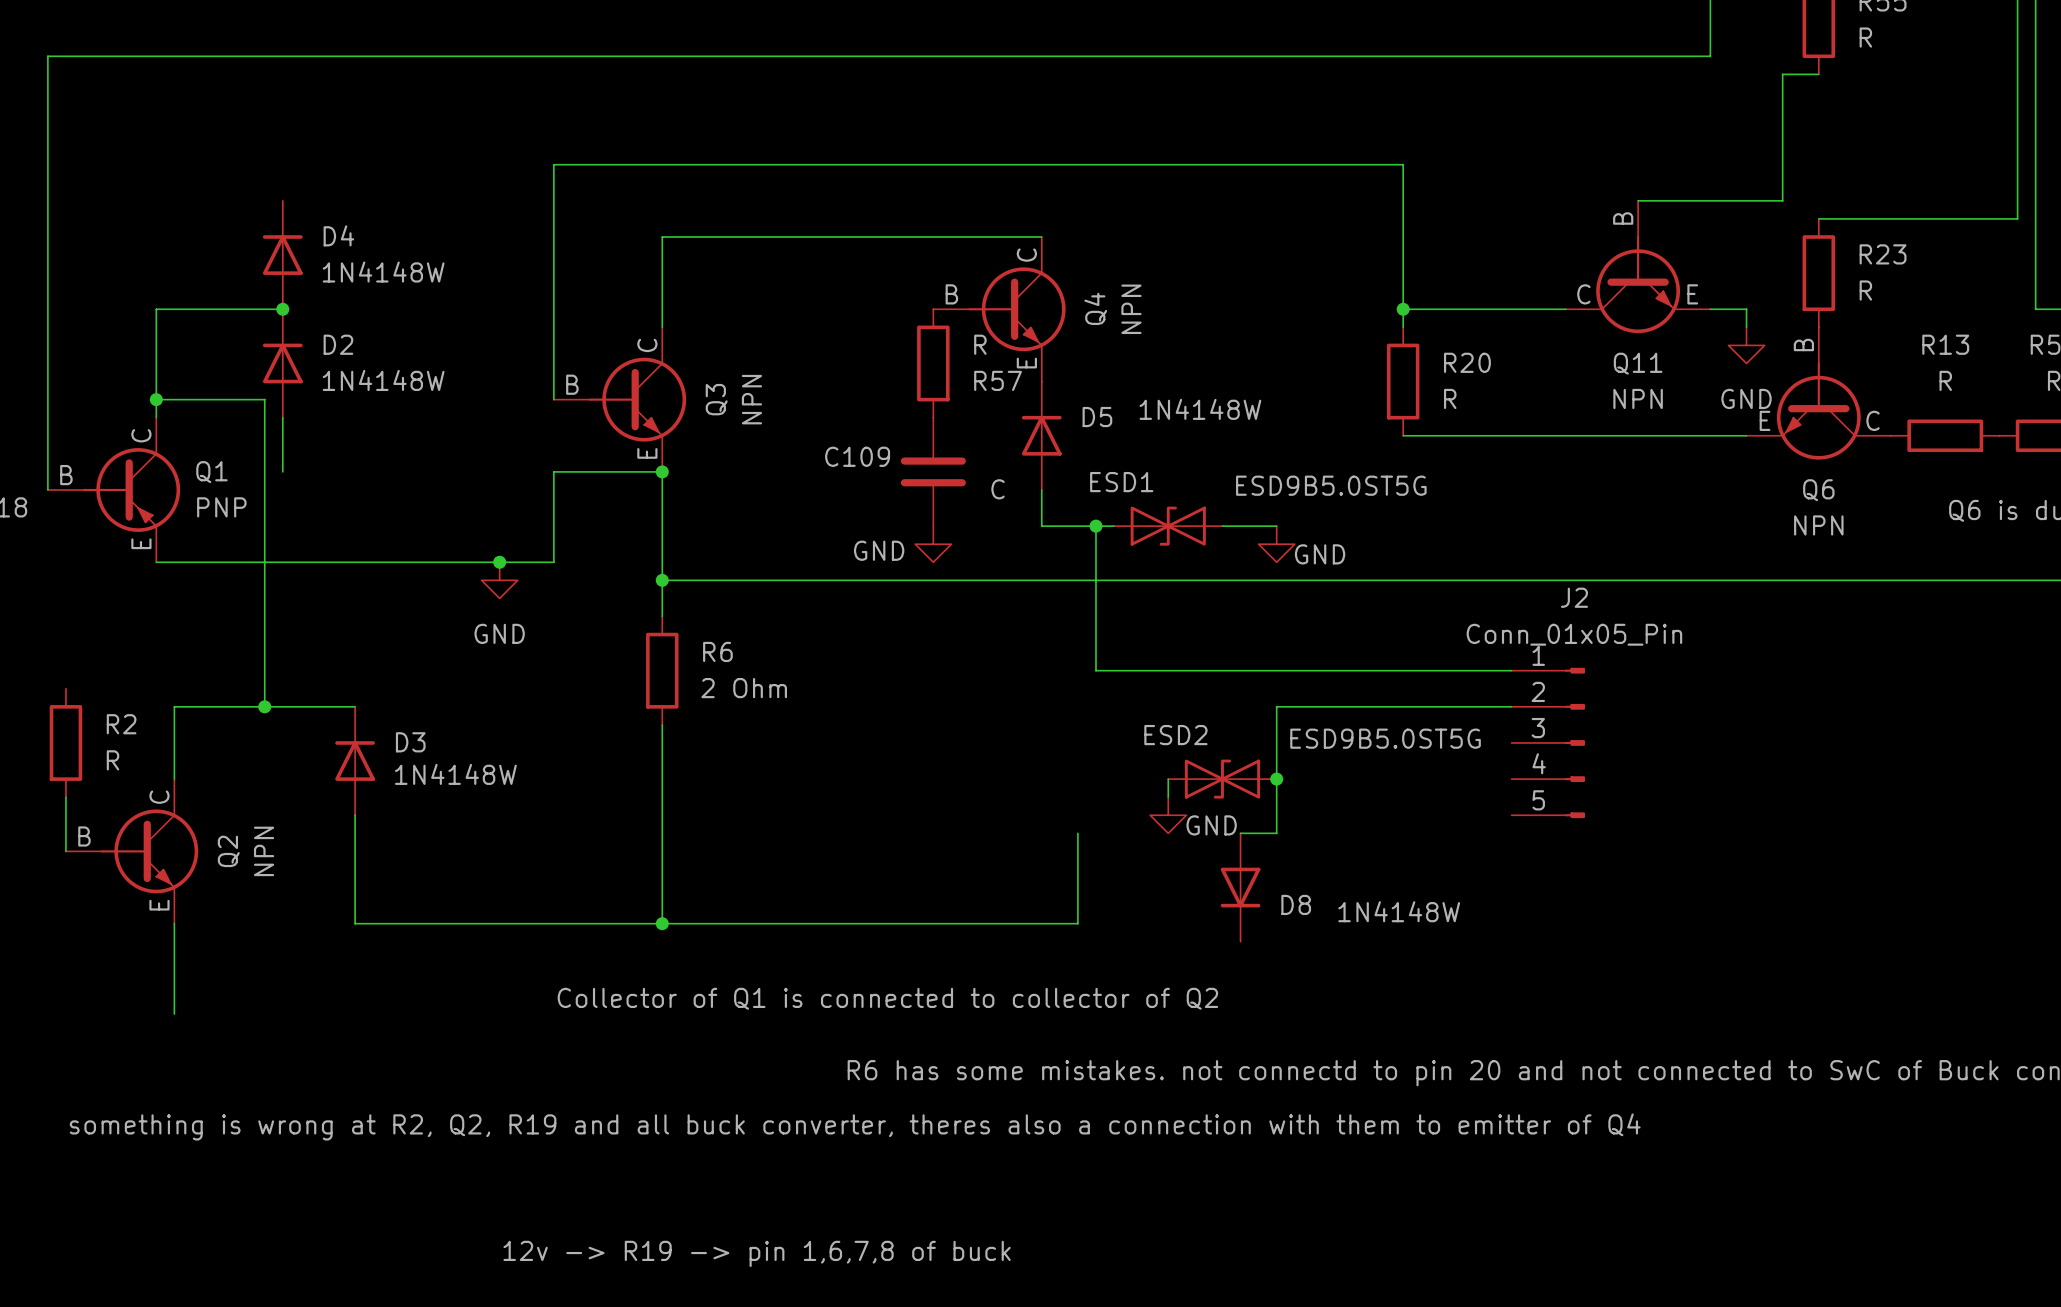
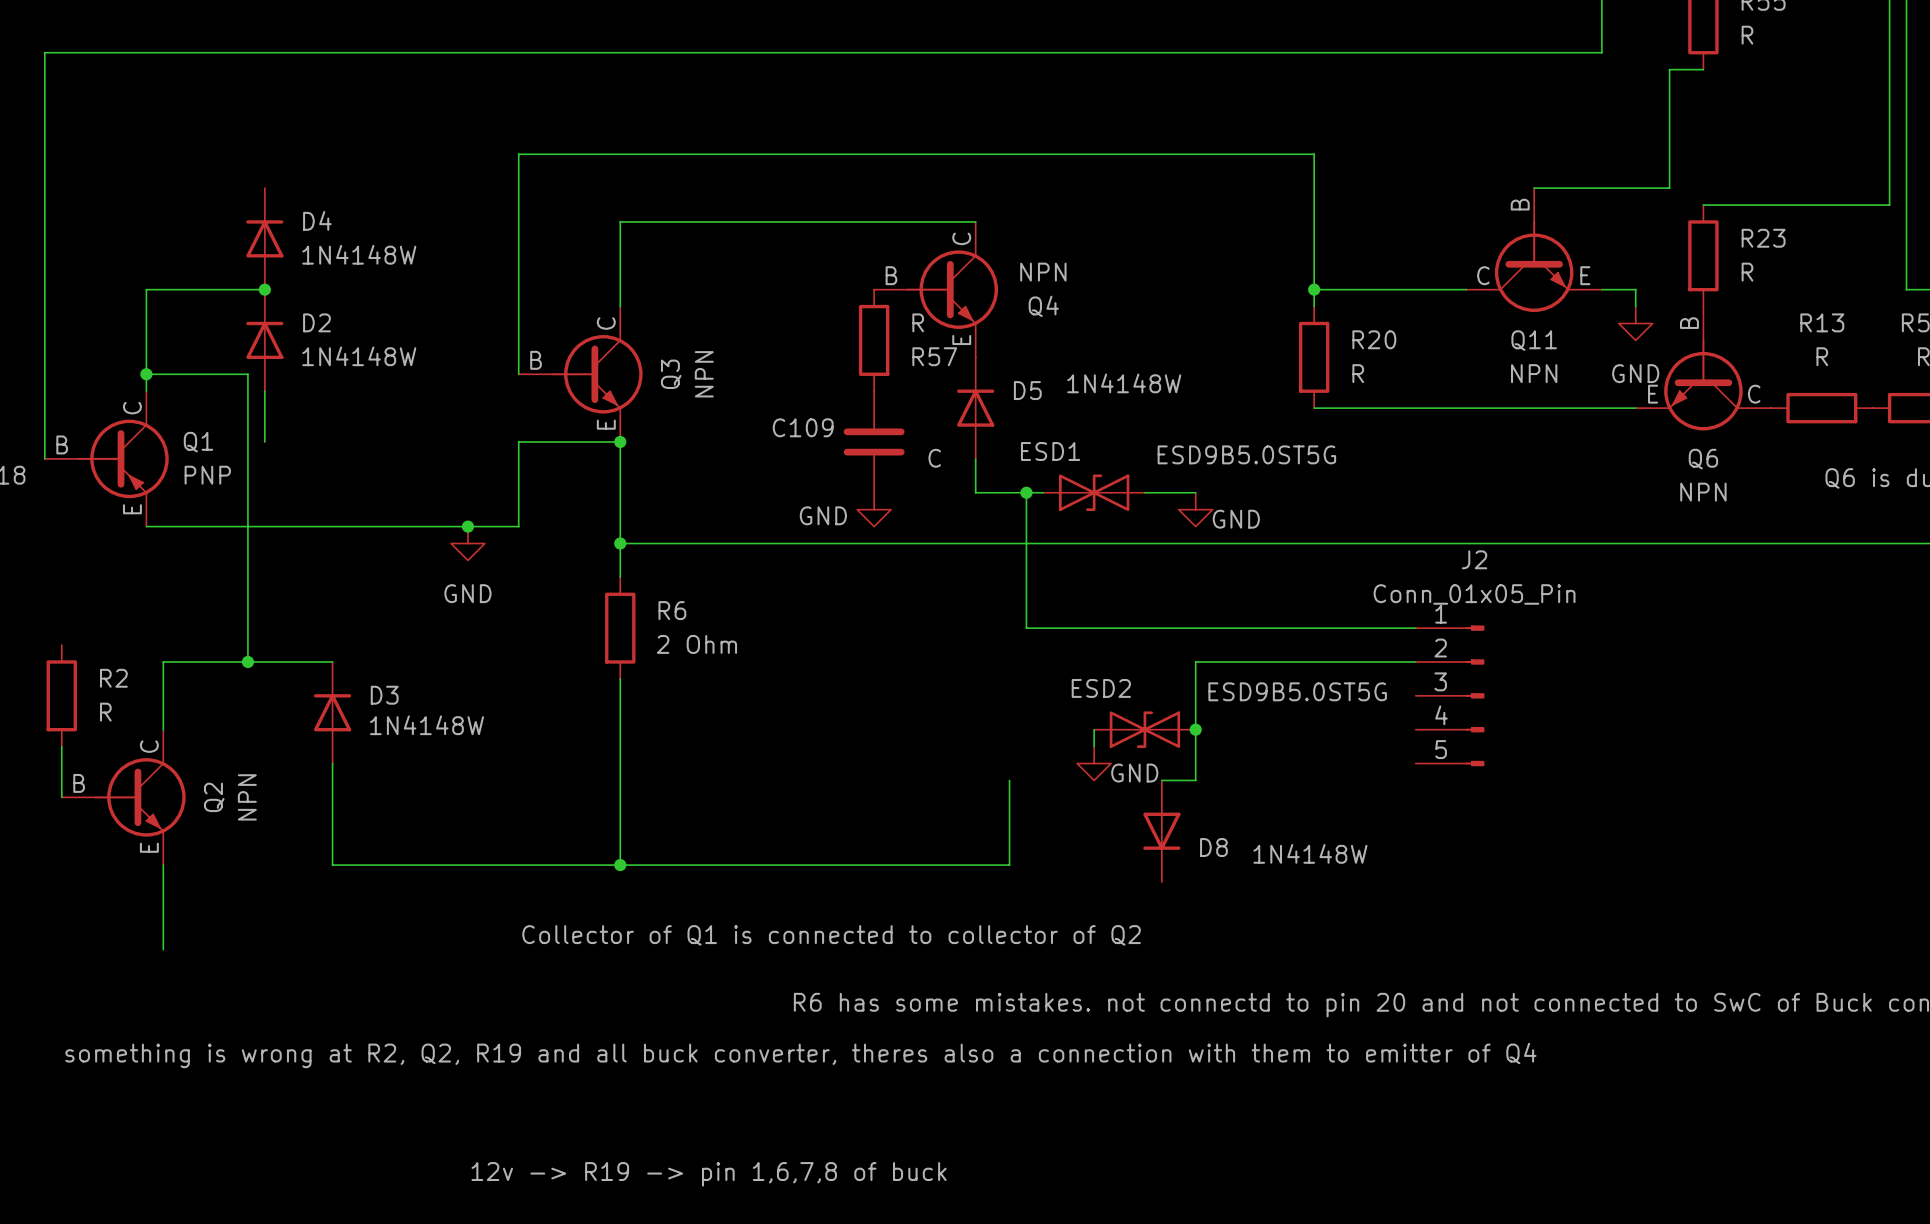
Q4 name rotation: 0° (1095, 308) -> 90° clockwise (1043, 306)
Q4 value rotation: 0° (1131, 309) -> 90° clockwise (1043, 272)

